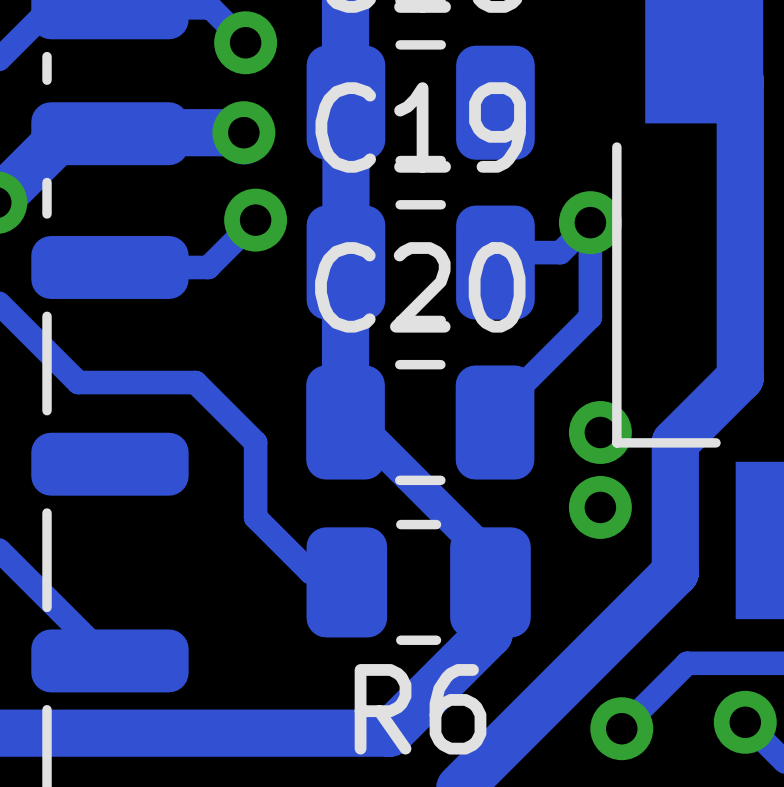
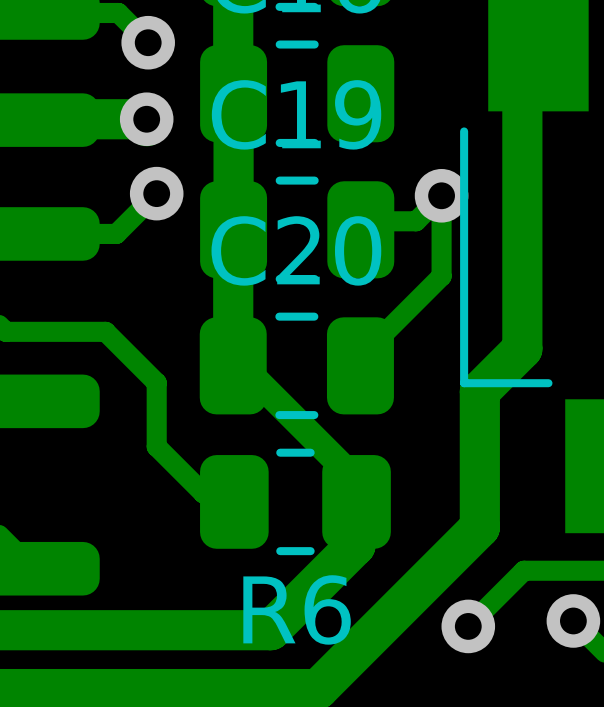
track: (704, 44) (740, 80) (740, 377) (675, 442) (675, 572) (635, 612) -> (538, 44) (522, 60) (522, 348) (479, 391) (479, 527)
via: (600, 432) -> none
via: (600, 507) -> none

